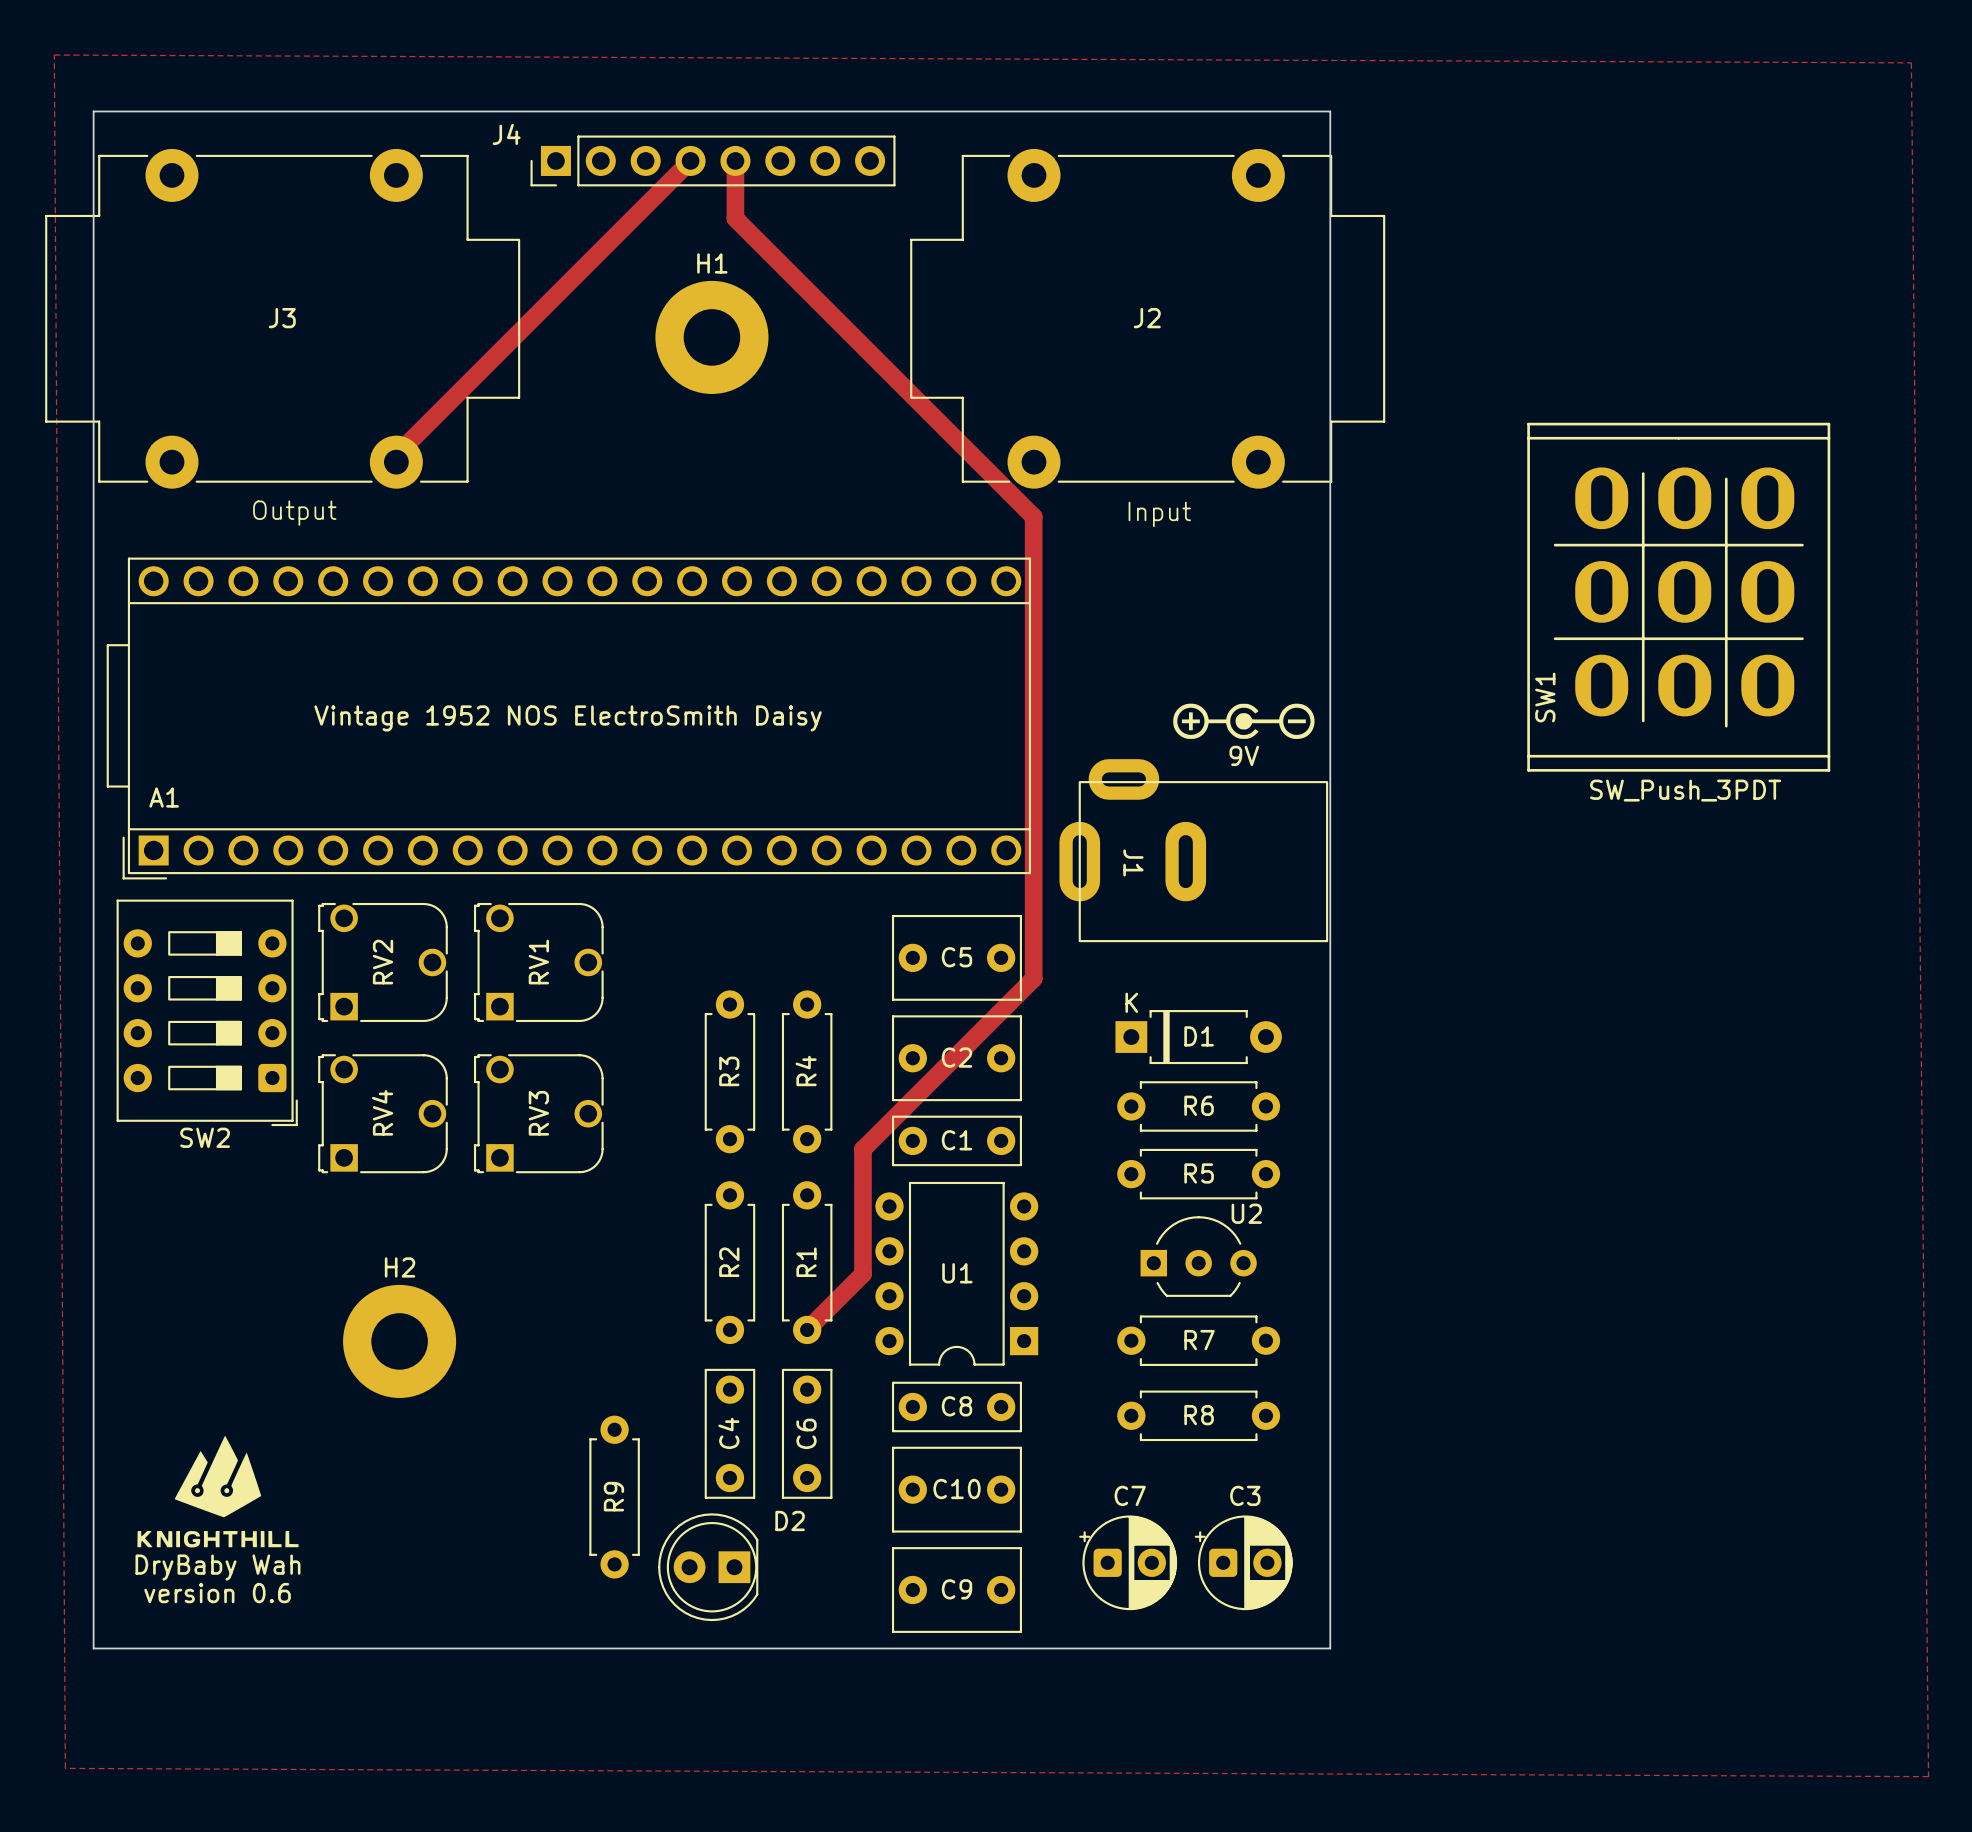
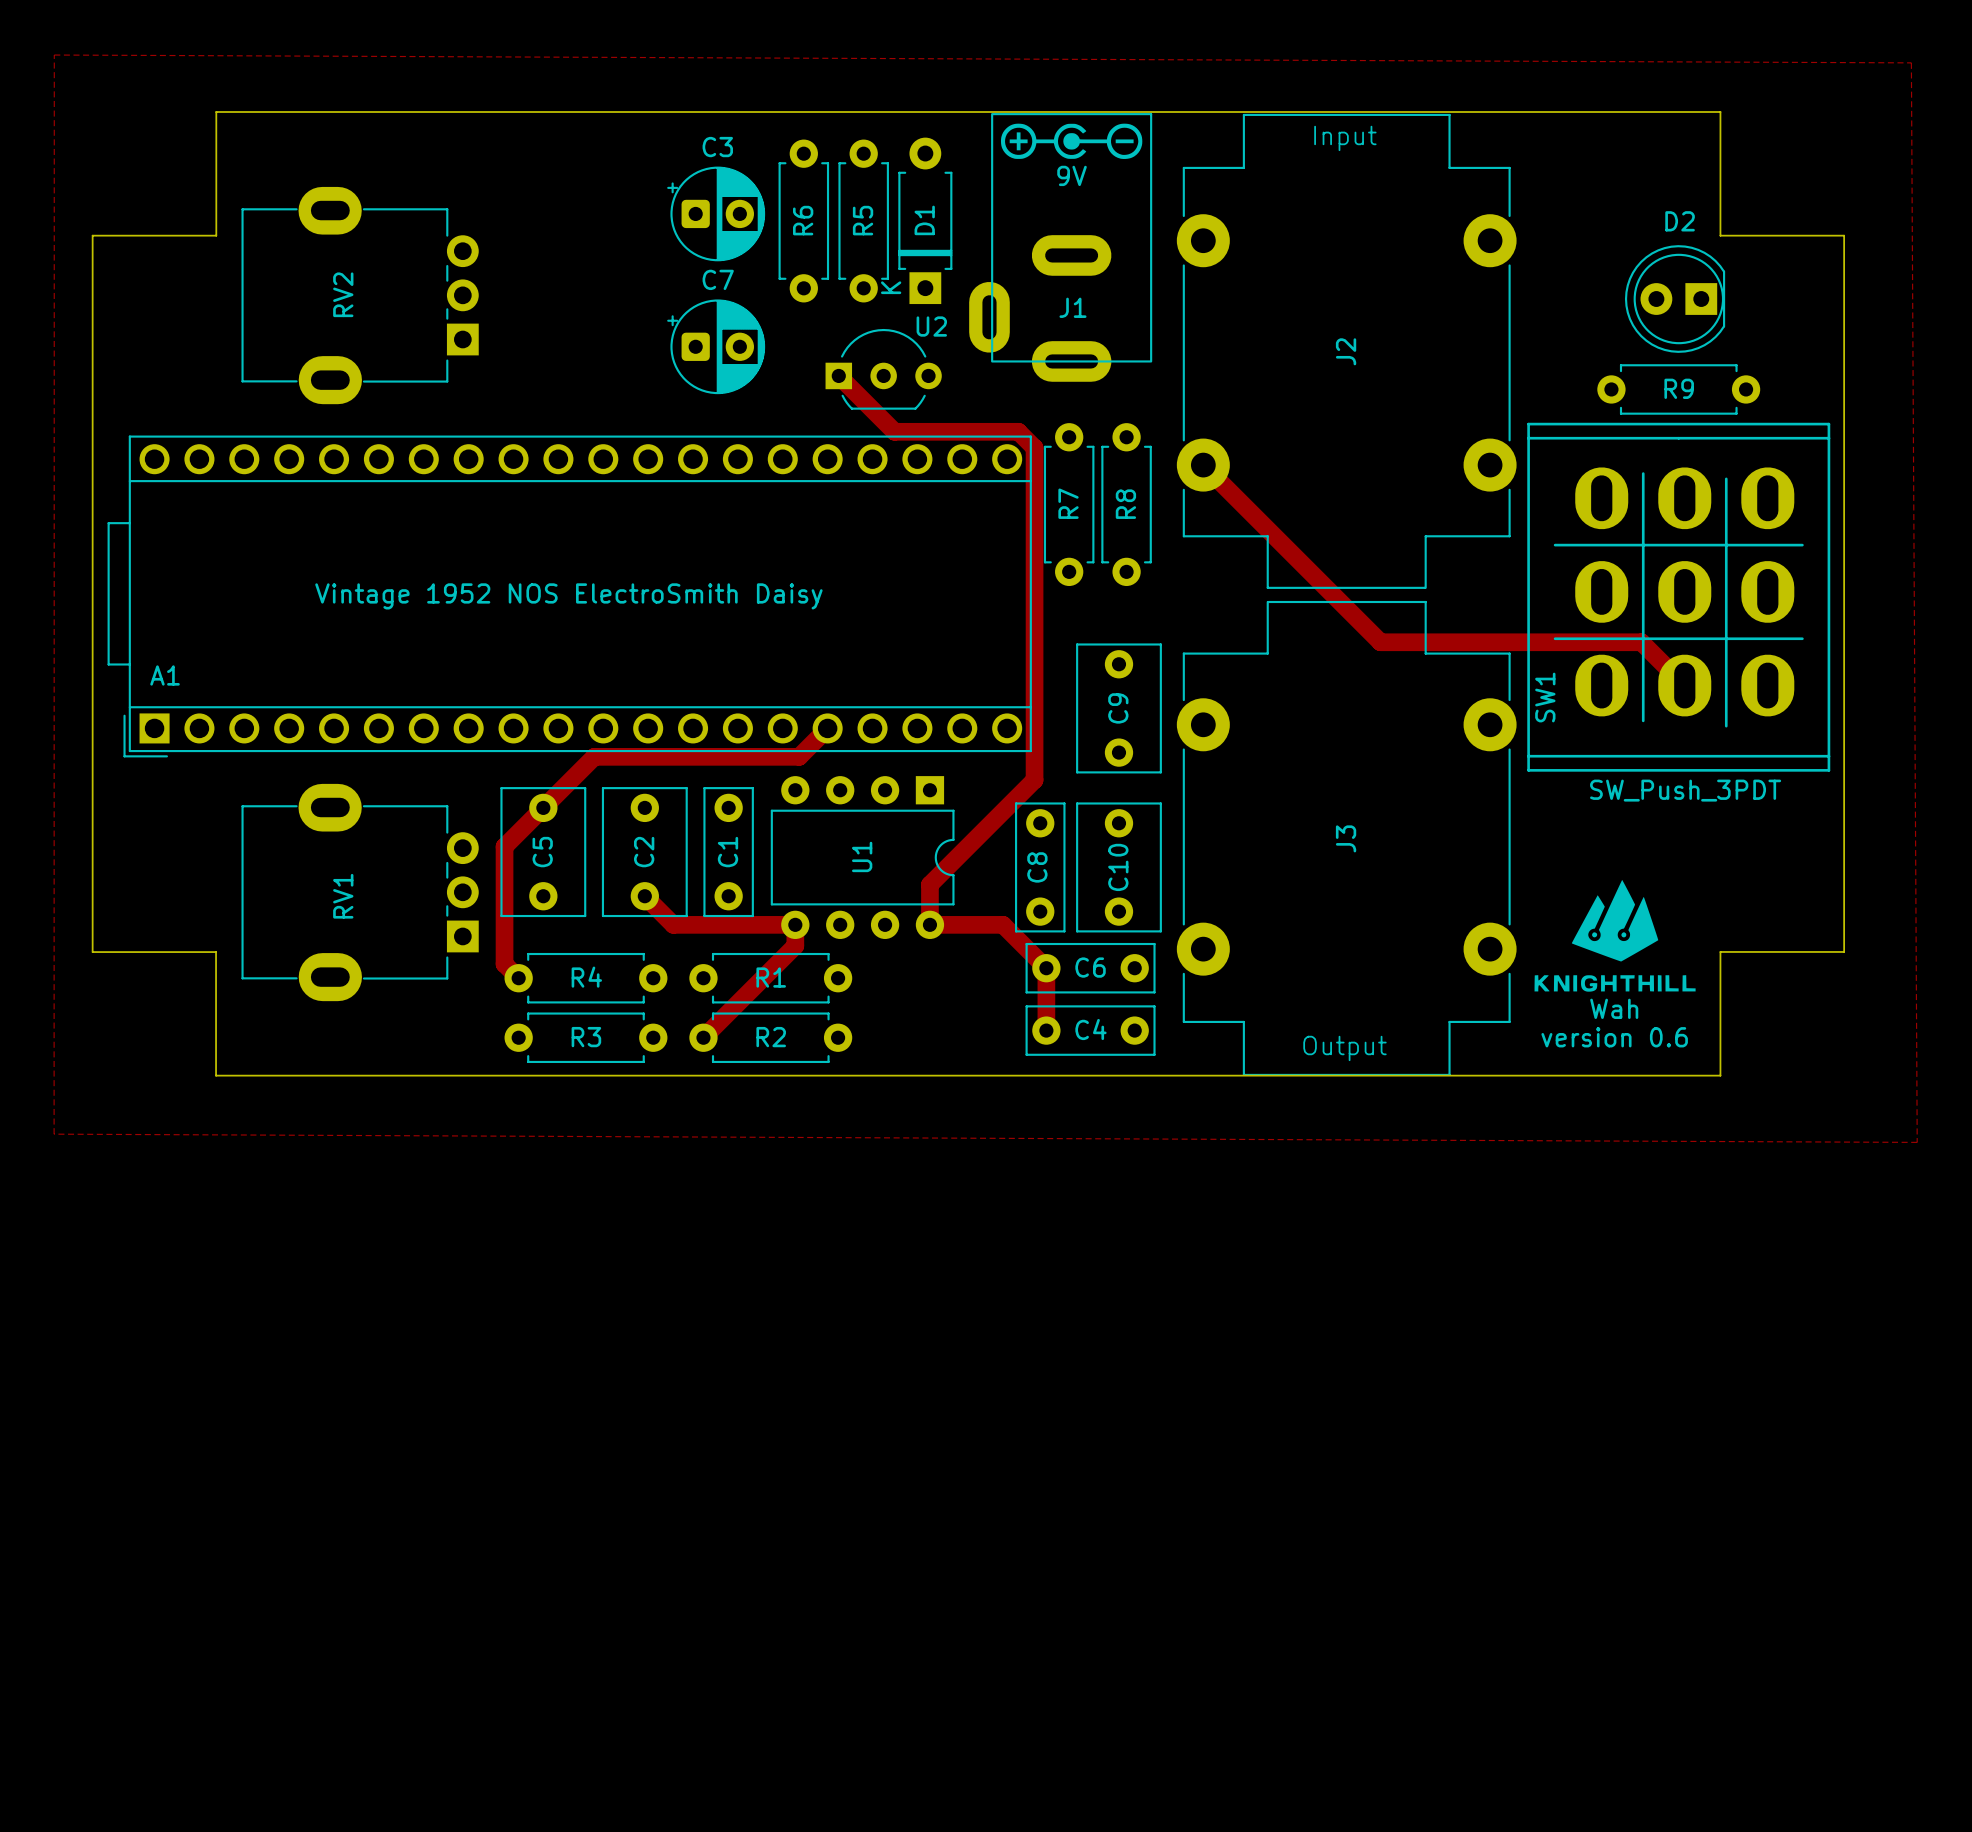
zone outline: (54, 55) (65, 1768) (1928, 1776) (1911, 62) -> (54, 55) (54, 1134) (1917, 1142) (1911, 62)
board edge: (93, 111) (1330, 111) (1330, 1648) (93, 1648) (93, 111) -> none
board edge: none -> (216, 111) (216, 235) (92, 235) (92, 952) (216, 952) (216, 1075) (1720, 1075) (1720, 951) (1844, 951) (1844, 235) (1720, 235) (1720, 111) (216, 111)
drawing: none -> [1000, 123, 1143, 159]
track: (690, 160) (396, 455) (396, 462) -> none
J4: (713, 160) -> none
track: (735, 160) (735, 218) (1033, 516) (1033, 978) (862, 1149) (862, 1274) (807, 1329) -> none
text: none -> 9V (1072, 175)
J3 rotation: 0° (282, 318) -> 90° counterclockwise (1346, 838)
J3 position: (282, 318) -> (1346, 838)
J2 rotation: 0° (1147, 318) -> 90° counterclockwise (1346, 351)
H1: (711, 337) -> none
track: none -> (838, 375) (894, 431) (1018, 431) (1034, 447) (1034, 780) (929, 884) (929, 924) (1003, 924) (1046, 968) (1046, 1030)
track: none -> (1203, 465) (1380, 642) (1641, 642) (1684, 685)
text: Output (294, 513) -> none
text position: Input (1159, 514) -> Input (1345, 138)
drawing: [1173, 703, 1315, 739] -> none
A1 position: (568, 718) -> (569, 596)
text position: Vintage 1952 NOS ElectroSmith Daisy (568, 718) -> Vintage 1952 NOS ElectroSmith Daisy (568, 596)
track: none -> (827, 728) (799, 756) (594, 756) (504, 846) (504, 964) (518, 978)
text: 9V (1244, 755) -> none
J1 rotation: 0° (1193, 850) -> 90° counterclockwise (1060, 247)
J1 position: (1193, 850) -> (1060, 247)
drawing: none -> [1534, 879, 1696, 992]
track: none -> (644, 896) (673, 924) (795, 924) (795, 945) (703, 1037)
RV2 footprint: [318, 902, 448, 1023] -> [241, 186, 479, 405]
RV1 footprint: [473, 902, 604, 1023] -> [241, 783, 479, 1002]
C5 rotation: 0° (956, 957) -> 90° clockwise (543, 852)
C5 position: (956, 957) -> (543, 852)
text: none -> Wah (1614, 1008)
SW2: (207, 1012) -> none
D1 rotation: 0° (1198, 1037) -> 90° counterclockwise (925, 220)
D1 position: (1198, 1037) -> (925, 220)
text: none -> version 0.6 (1614, 1037)
text: none -> Output (1344, 1048)
C2 rotation: 0° (956, 1058) -> 90° clockwise (644, 852)
C2 position: (956, 1058) -> (644, 852)
R3 rotation: 0° (729, 1071) -> 90° clockwise (585, 1037)
R3 position: (729, 1071) -> (585, 1037)
R4 rotation: 0° (807, 1071) -> 90° clockwise (585, 978)
R4 position: (807, 1071) -> (585, 978)
R6 rotation: 0° (1198, 1106) -> 90° clockwise (803, 221)
R6 position: (1198, 1106) -> (803, 221)
RV4: (382, 1113) -> none
RV3: (538, 1113) -> none
C1 rotation: 0° (956, 1140) -> 90° clockwise (728, 852)
C1 position: (956, 1140) -> (728, 852)
R5 rotation: 0° (1198, 1174) -> 90° clockwise (863, 221)
R5 position: (1198, 1174) -> (863, 221)
U2 position: (1198, 1256) -> (883, 369)
R2 rotation: 0° (729, 1262) -> 90° clockwise (770, 1037)
R2 position: (729, 1262) -> (770, 1037)
R1 rotation: 0° (807, 1262) -> 90° clockwise (770, 978)
R1 position: (807, 1262) -> (770, 978)
U1 rotation: 0° (956, 1273) -> 90° counterclockwise (862, 857)
U1 position: (956, 1273) -> (862, 857)
R7 rotation: 0° (1198, 1340) -> 90° clockwise (1069, 504)
R7 position: (1198, 1340) -> (1069, 504)
H2: (399, 1341) -> none
C8 rotation: 0° (956, 1406) -> 90° clockwise (1040, 867)
C8 position: (956, 1406) -> (1040, 867)
R8 rotation: 0° (1198, 1415) -> 90° clockwise (1126, 504)
R8 position: (1198, 1415) -> (1126, 504)
C4 rotation: 0° (729, 1433) -> 90° clockwise (1090, 1030)
C4 position: (729, 1433) -> (1090, 1030)
C6 rotation: 0° (807, 1433) -> 90° clockwise (1090, 968)
C6 position: (807, 1433) -> (1090, 968)
drawing: [137, 1435, 299, 1548] -> none
C10 rotation: 0° (956, 1489) -> 90° clockwise (1118, 867)
C10 position: (956, 1489) -> (1118, 867)
R9 rotation: 0° (614, 1497) -> 90° clockwise (1678, 389)
R9 position: (614, 1497) -> (1678, 389)
D2 name position: D2 (790, 1520) -> D2 (1680, 221)
C7 position: (1128, 1562) -> (716, 346)
C3 position: (1243, 1562) -> (716, 213)
text: DryBaby Wah (217, 1567) -> none
D2 position: (708, 1567) -> (1675, 299)
C9 rotation: 0° (956, 1590) -> 90° clockwise (1118, 708)
C9 position: (956, 1590) -> (1118, 708)
text: version 0.6 (217, 1593) -> none

